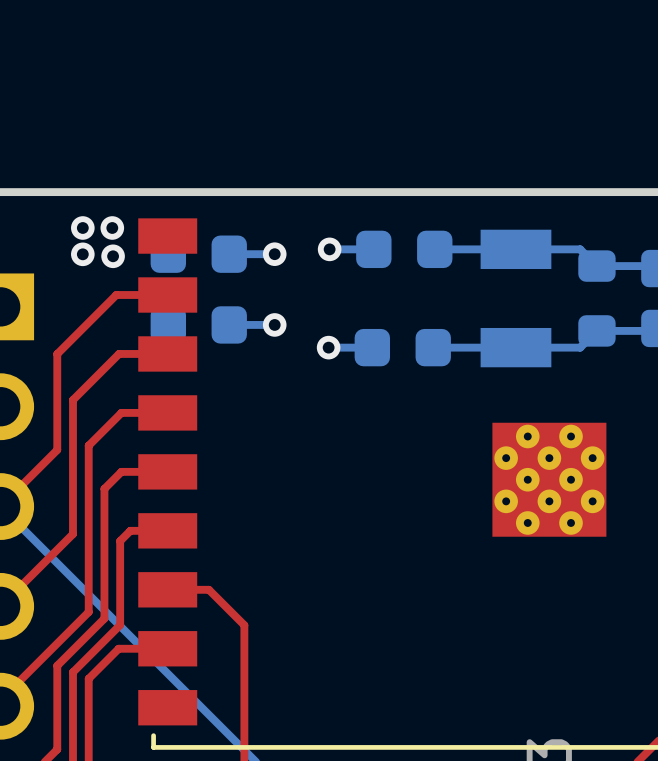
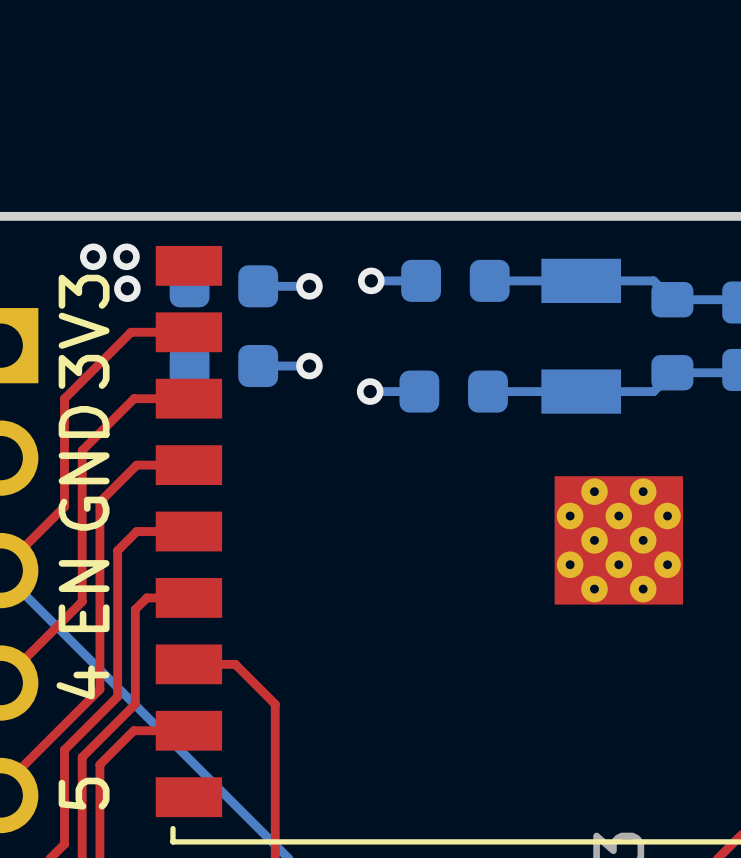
via: (82, 254) -> none
text: none -> 3V3 (84, 331)
text: none -> GND (84, 468)
text: none -> EN (84, 596)
text: none -> 4 (83, 682)
text: none -> 5 (84, 793)

